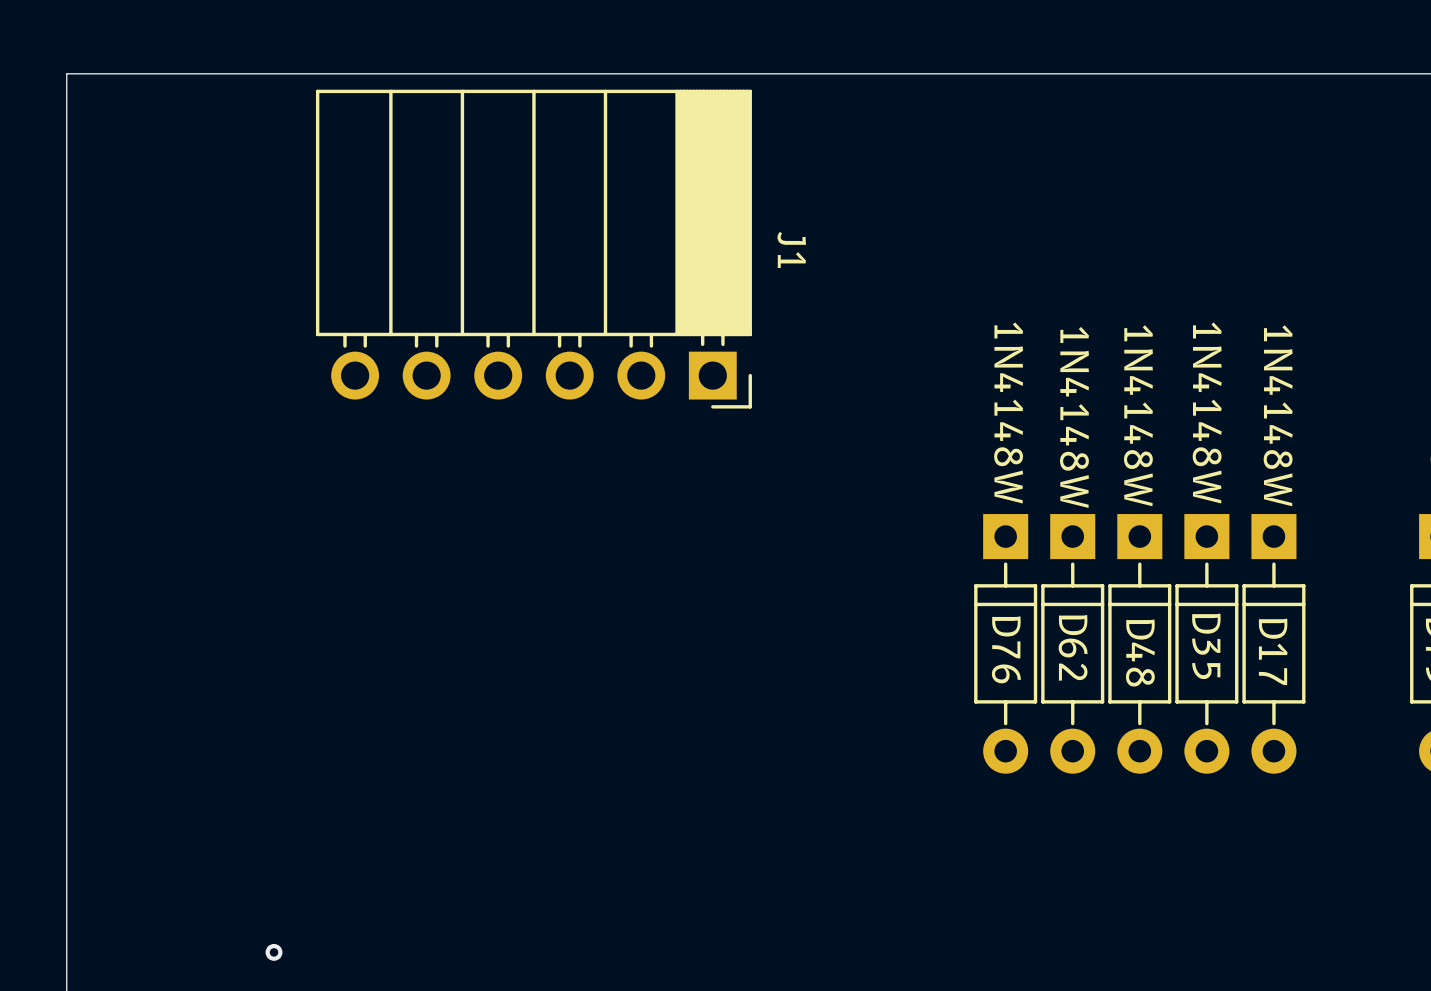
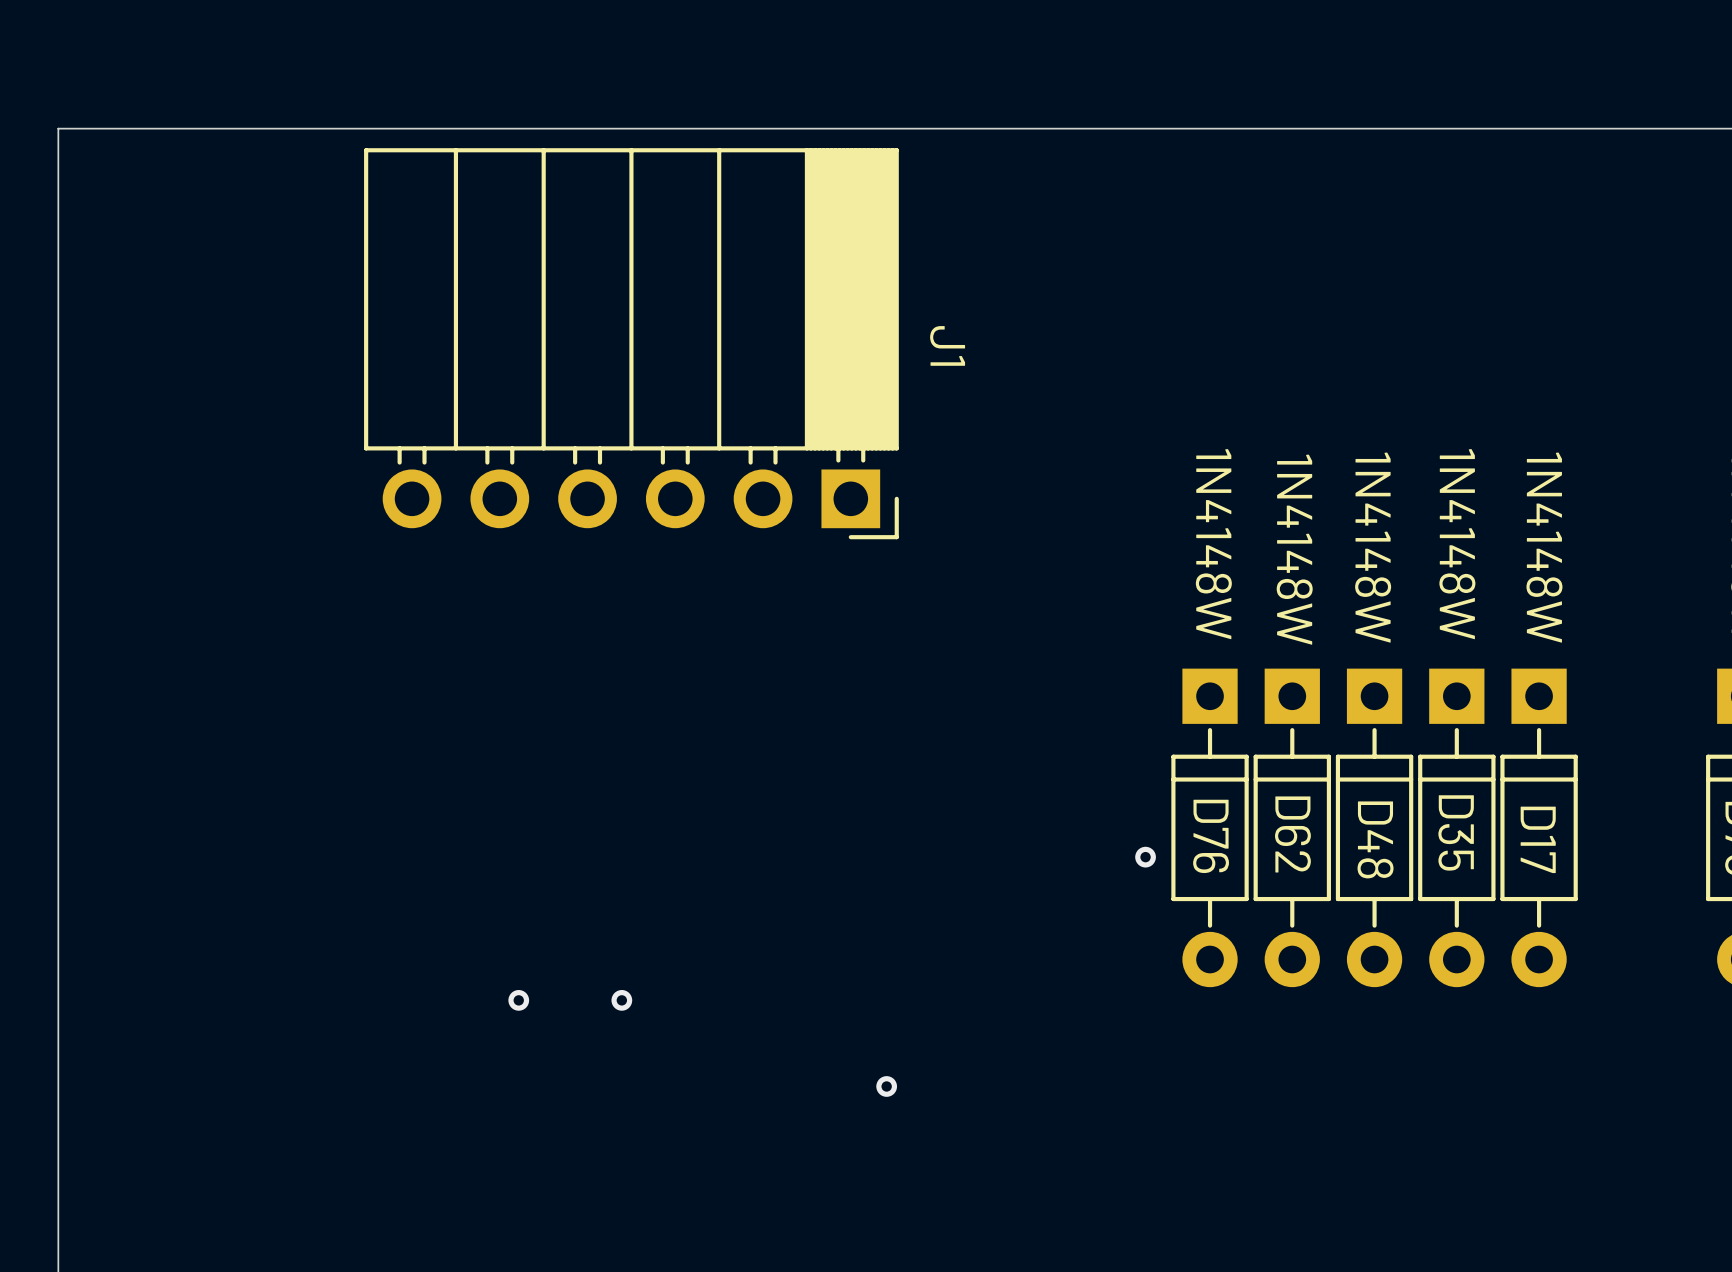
via: none -> (1145, 857)
via: none -> (518, 1000)
via: none -> (621, 1000)
via: none -> (886, 1086)
via: (274, 952) -> none

